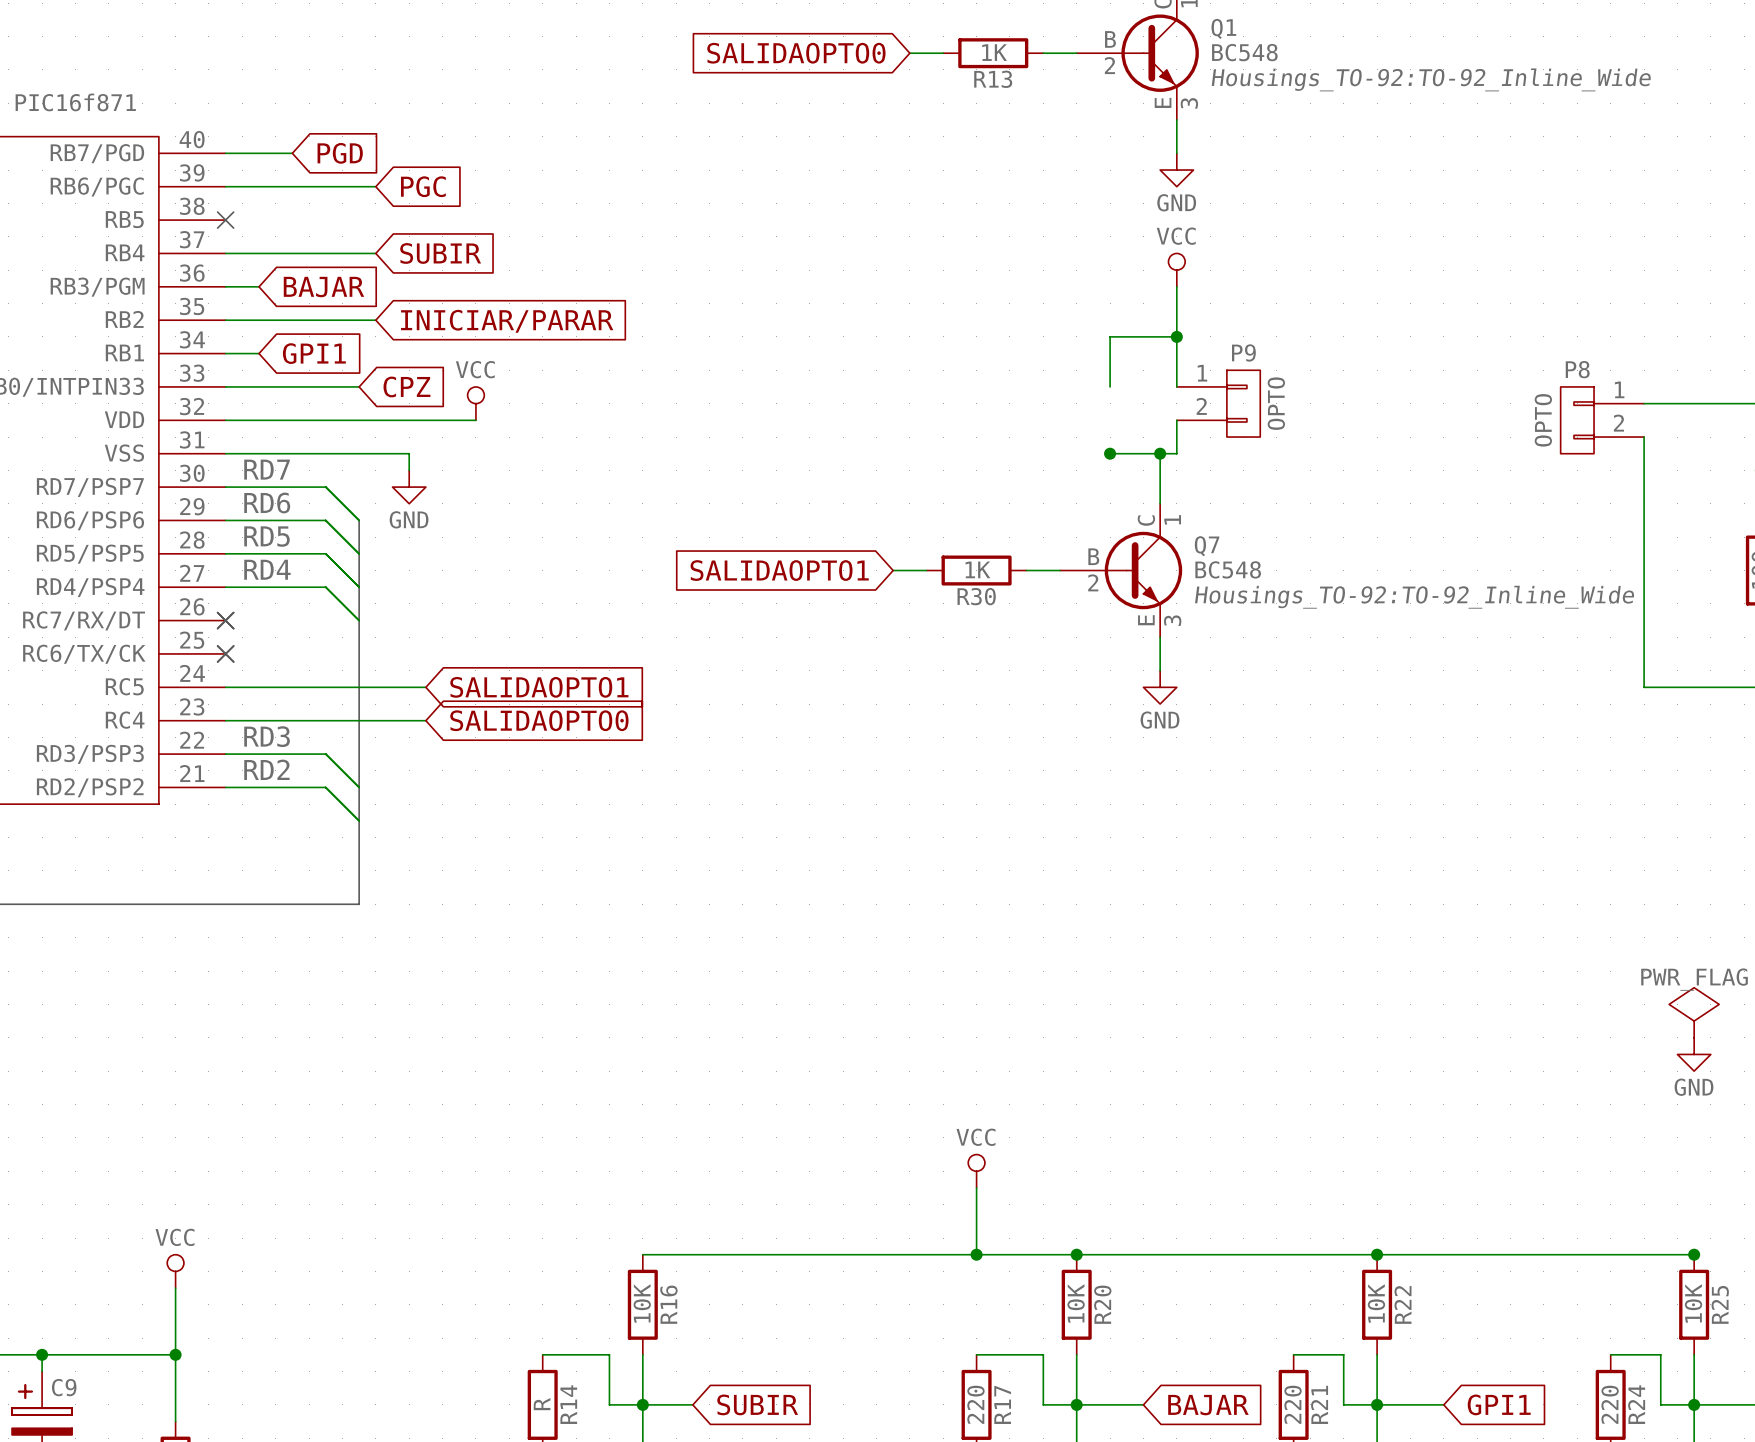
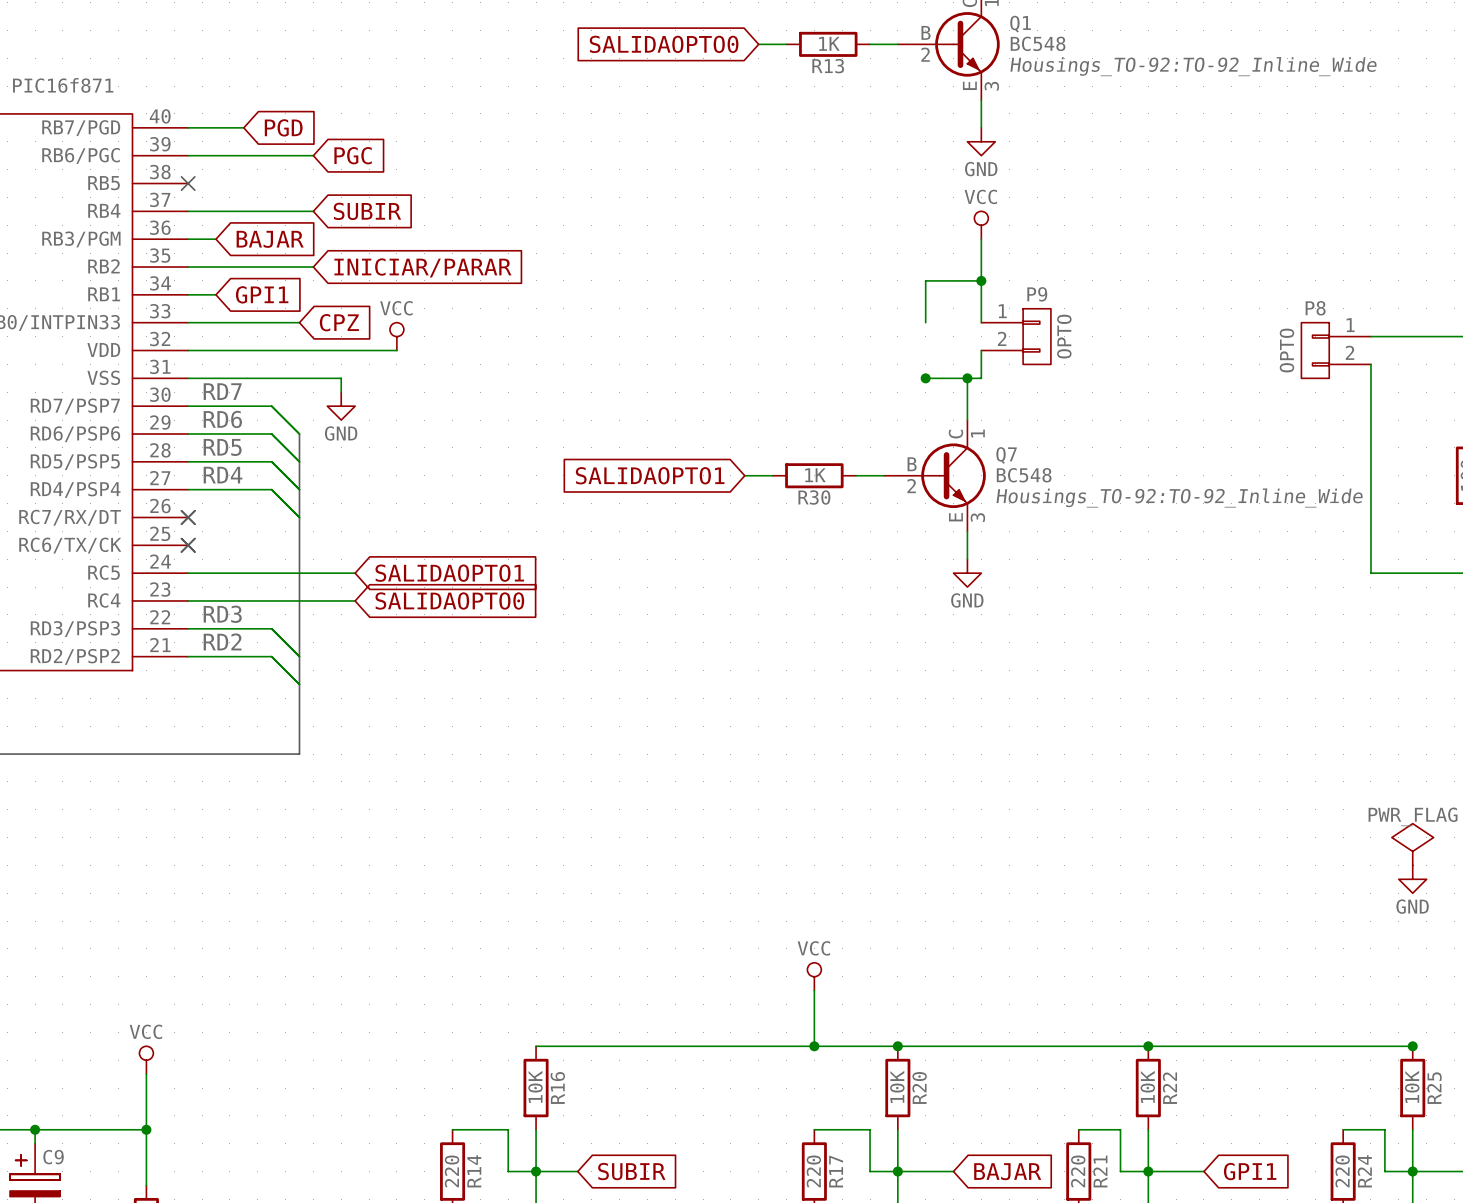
R14 value: R (542, 1404) -> 220 (452, 1171)

